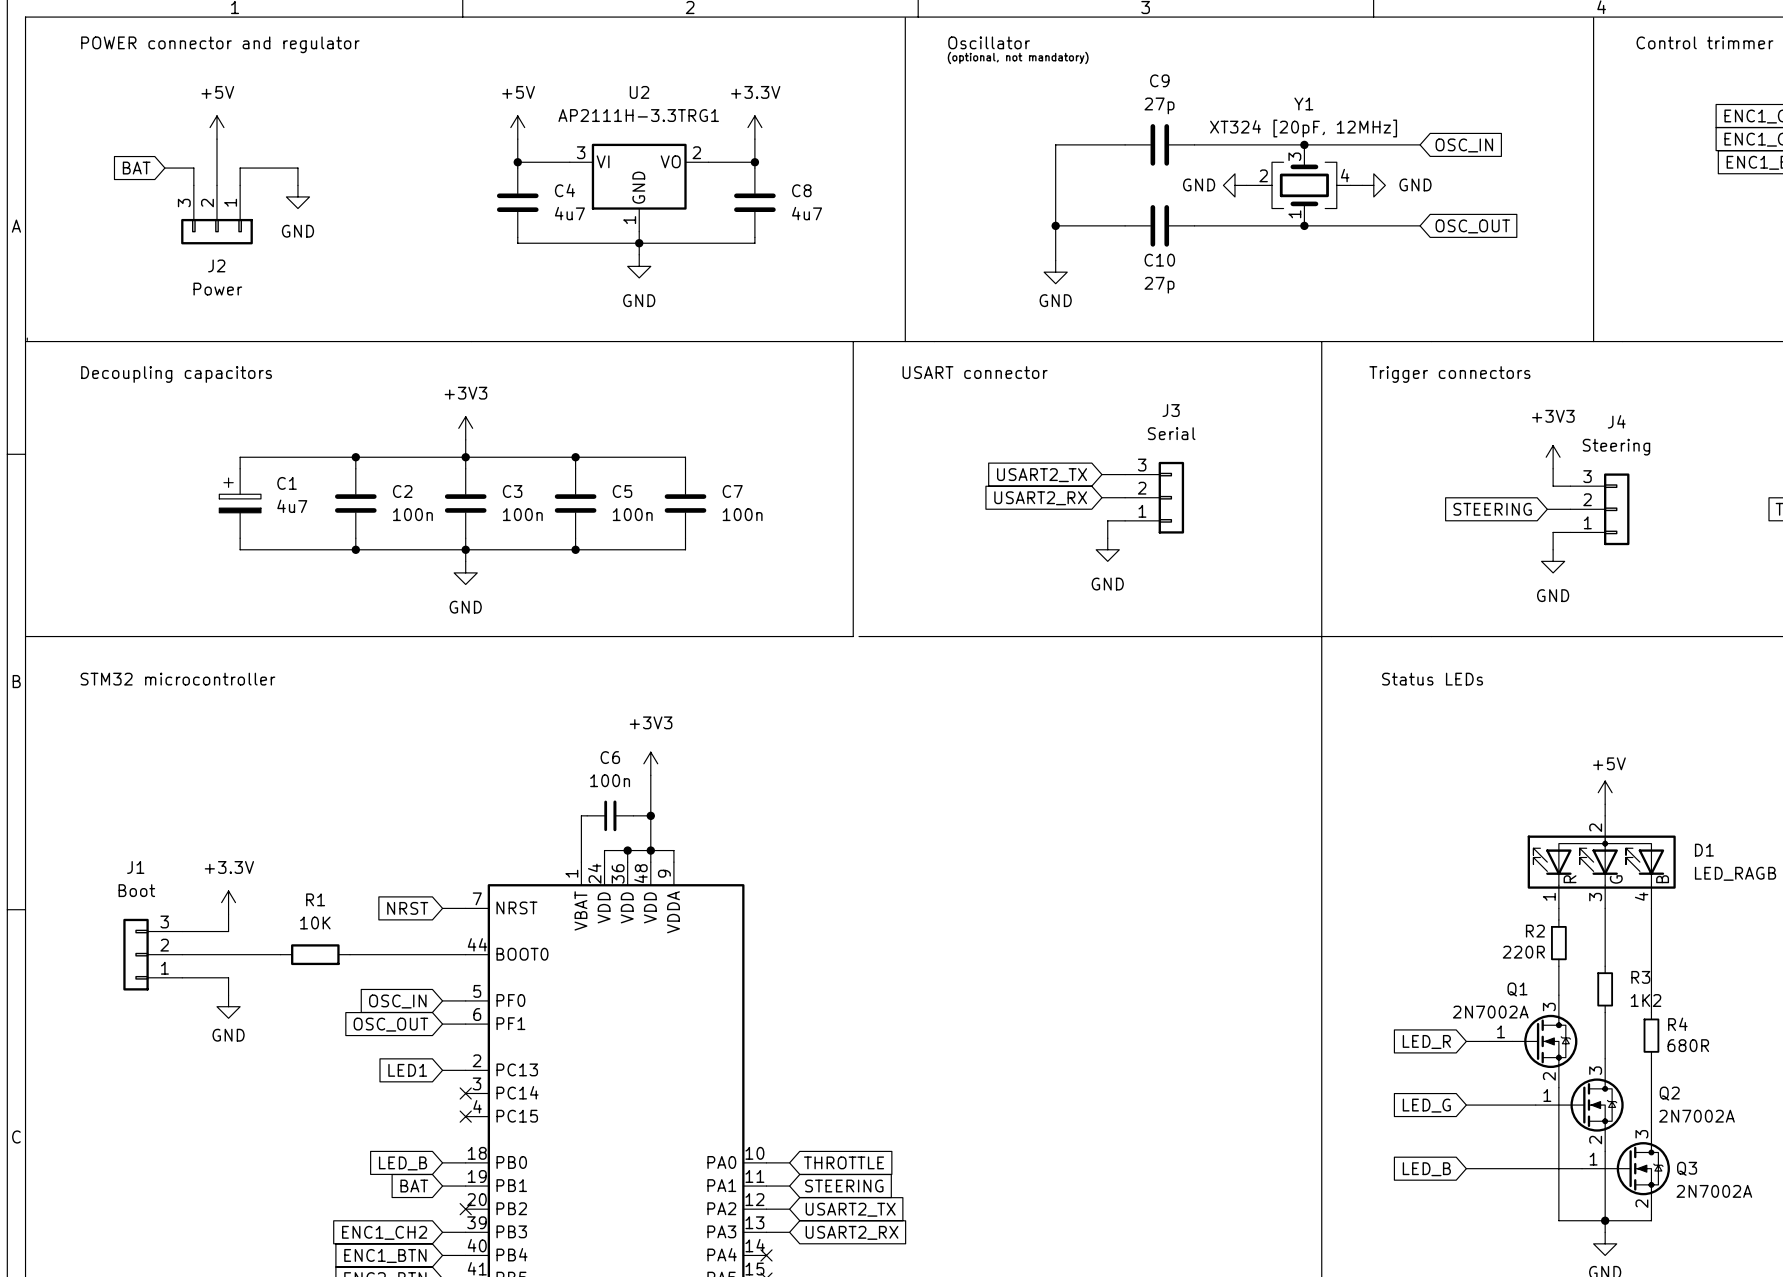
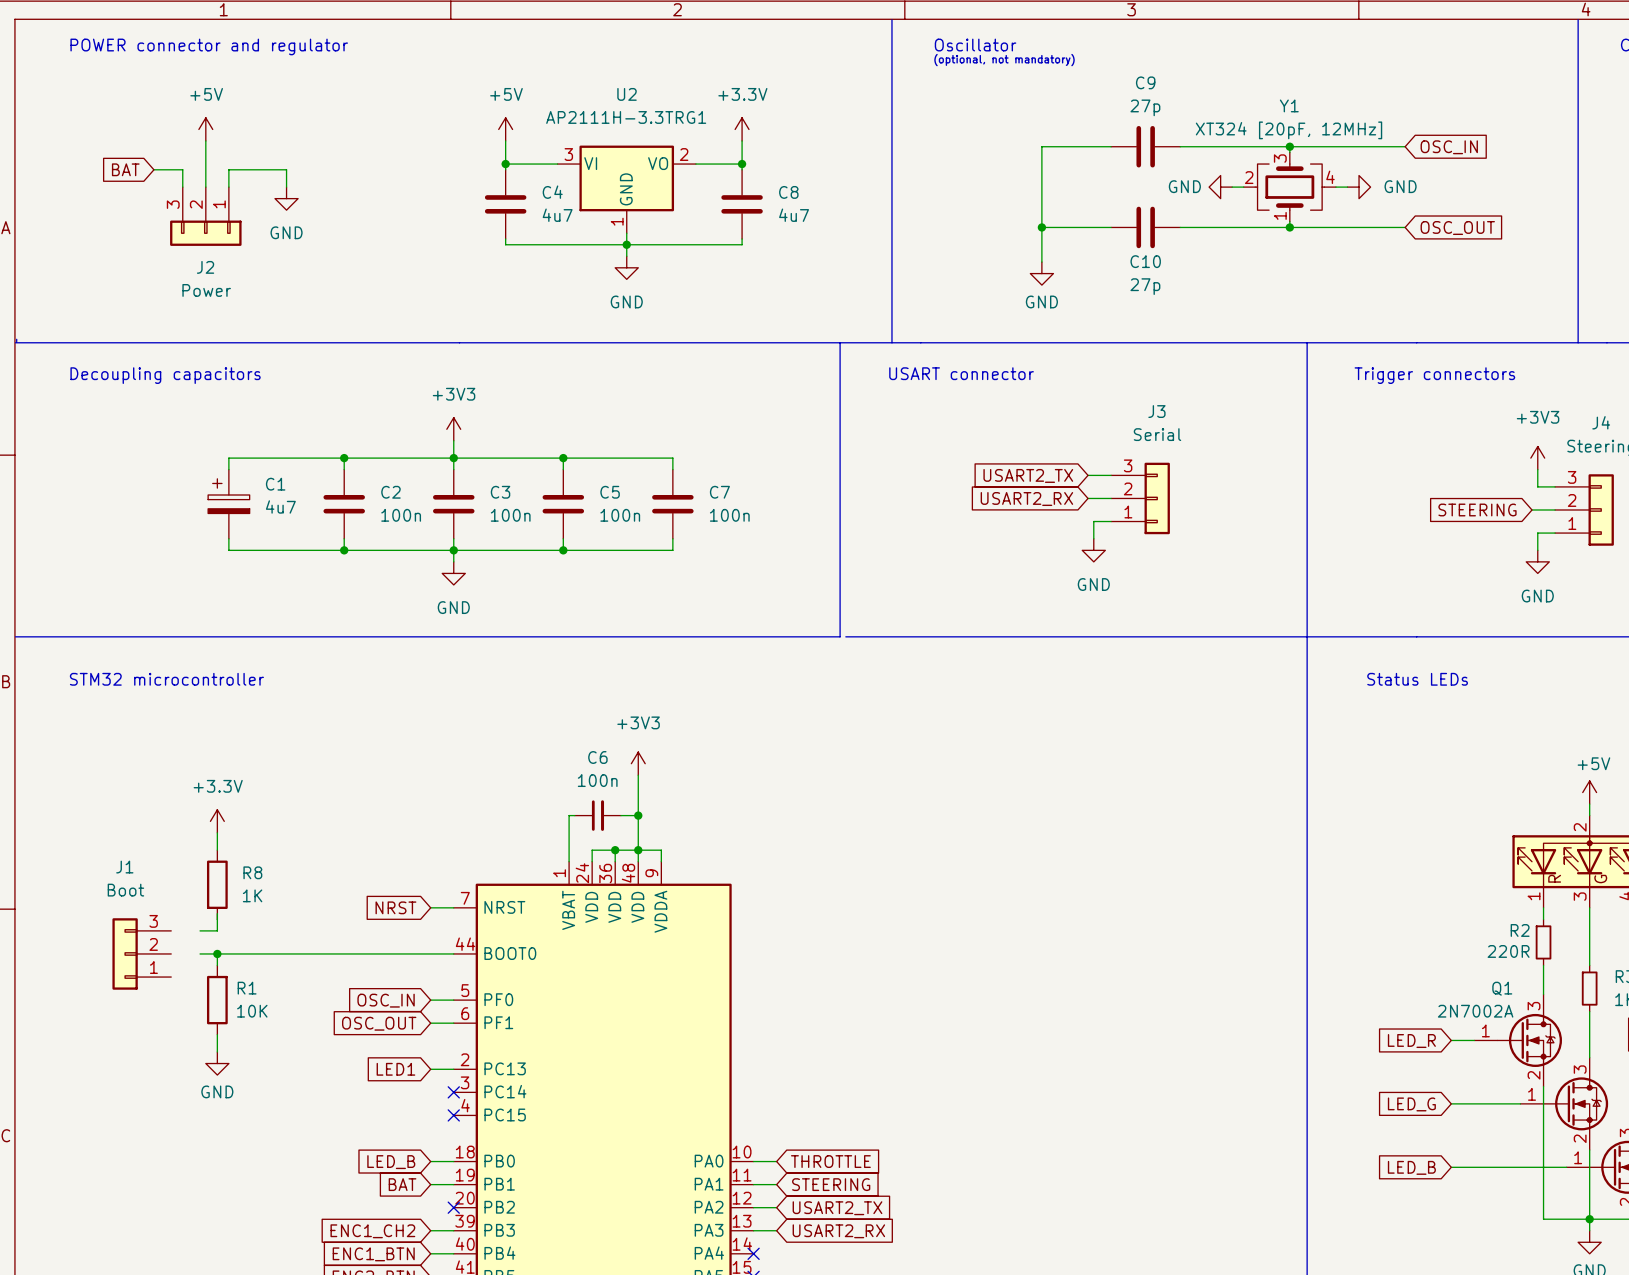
wire: none -> (217, 832) (217, 850)
R8: none -> 1K (217, 884)
R1 name position: R1 (315, 899) -> R1 (247, 988)
power symbol position: +3.3V (228, 902) -> +3.3V (217, 821)
wire: (182, 931) (211, 931) -> none
wire: (182, 954) (211, 954) -> none
wire: none -> (217, 953) (217, 965)
junction: none -> (217, 953)
wire: none -> (269, 953) (338, 953)
R1 rotation: 0° (315, 954) -> 90° clockwise (217, 1000)
R1 position: (315, 954) -> (217, 1000)
wire: (182, 977) (228, 977) (228, 995) -> none
power symbol position: GND (228, 1006) -> GND (217, 1063)
wire: none -> (217, 1034) (217, 1051)

